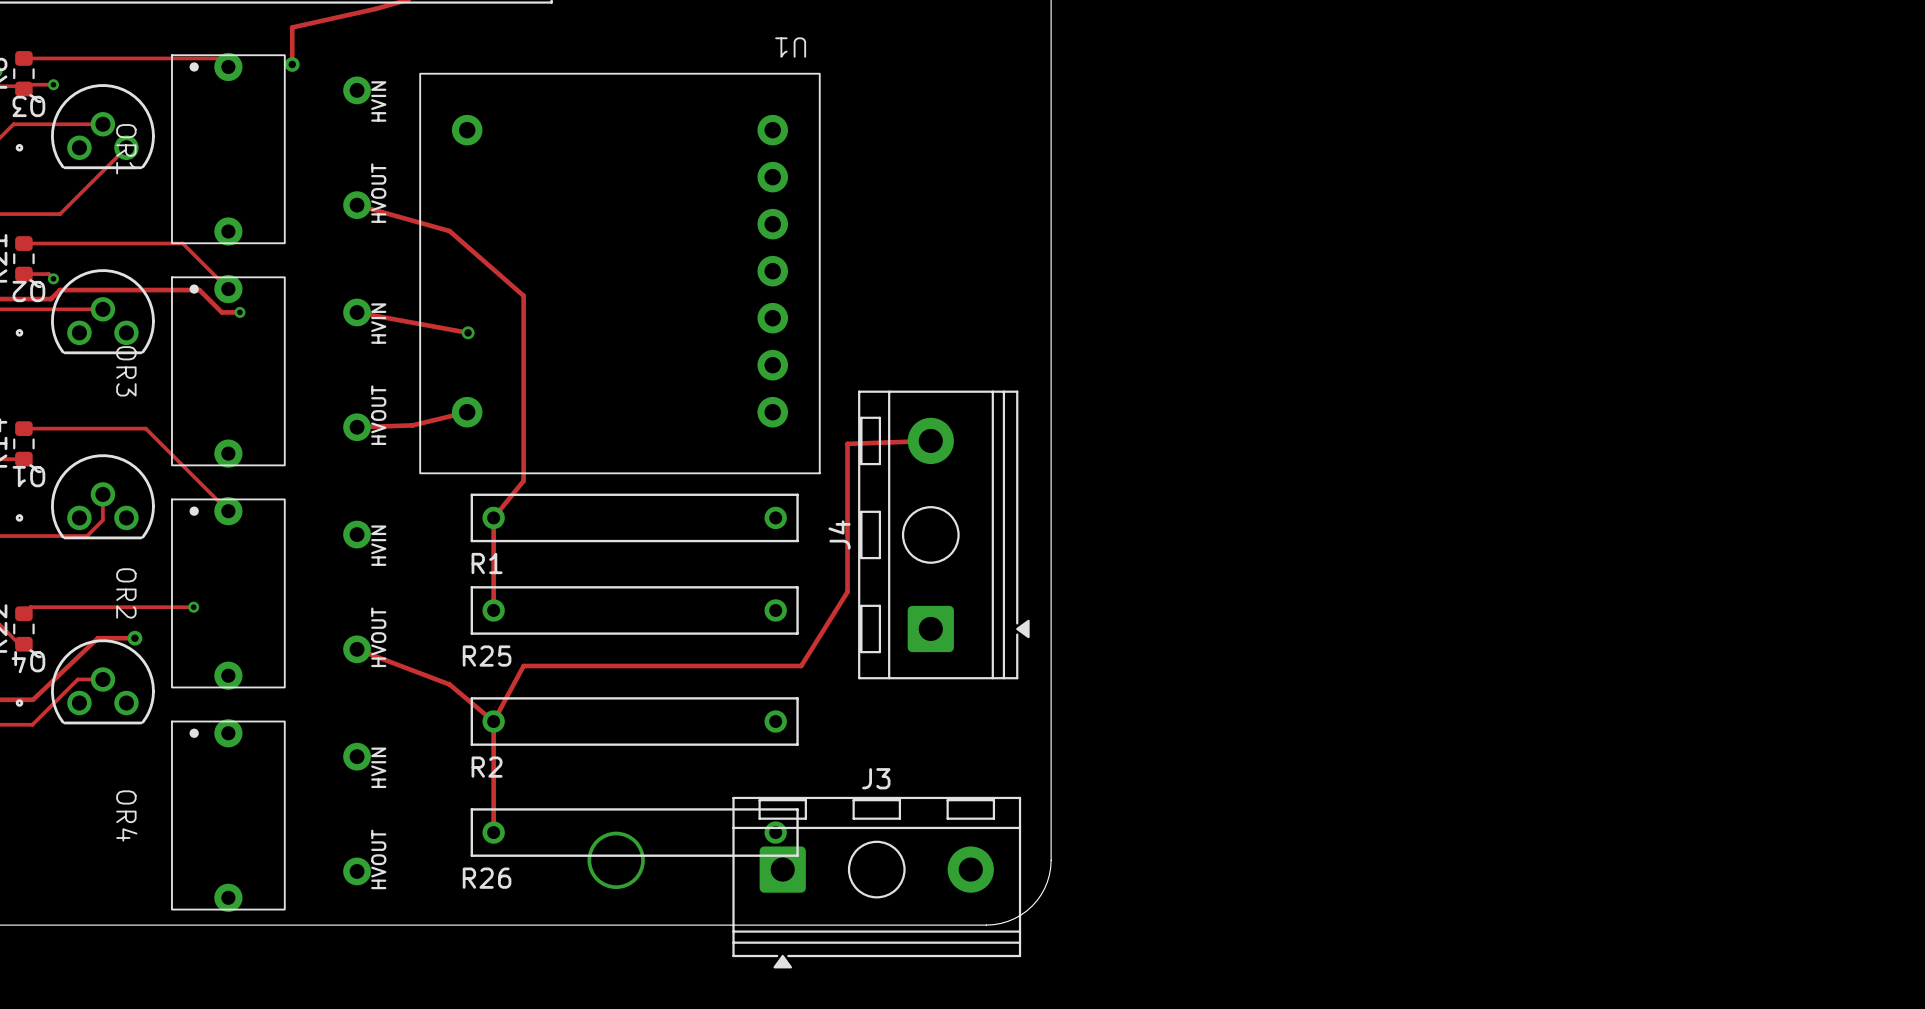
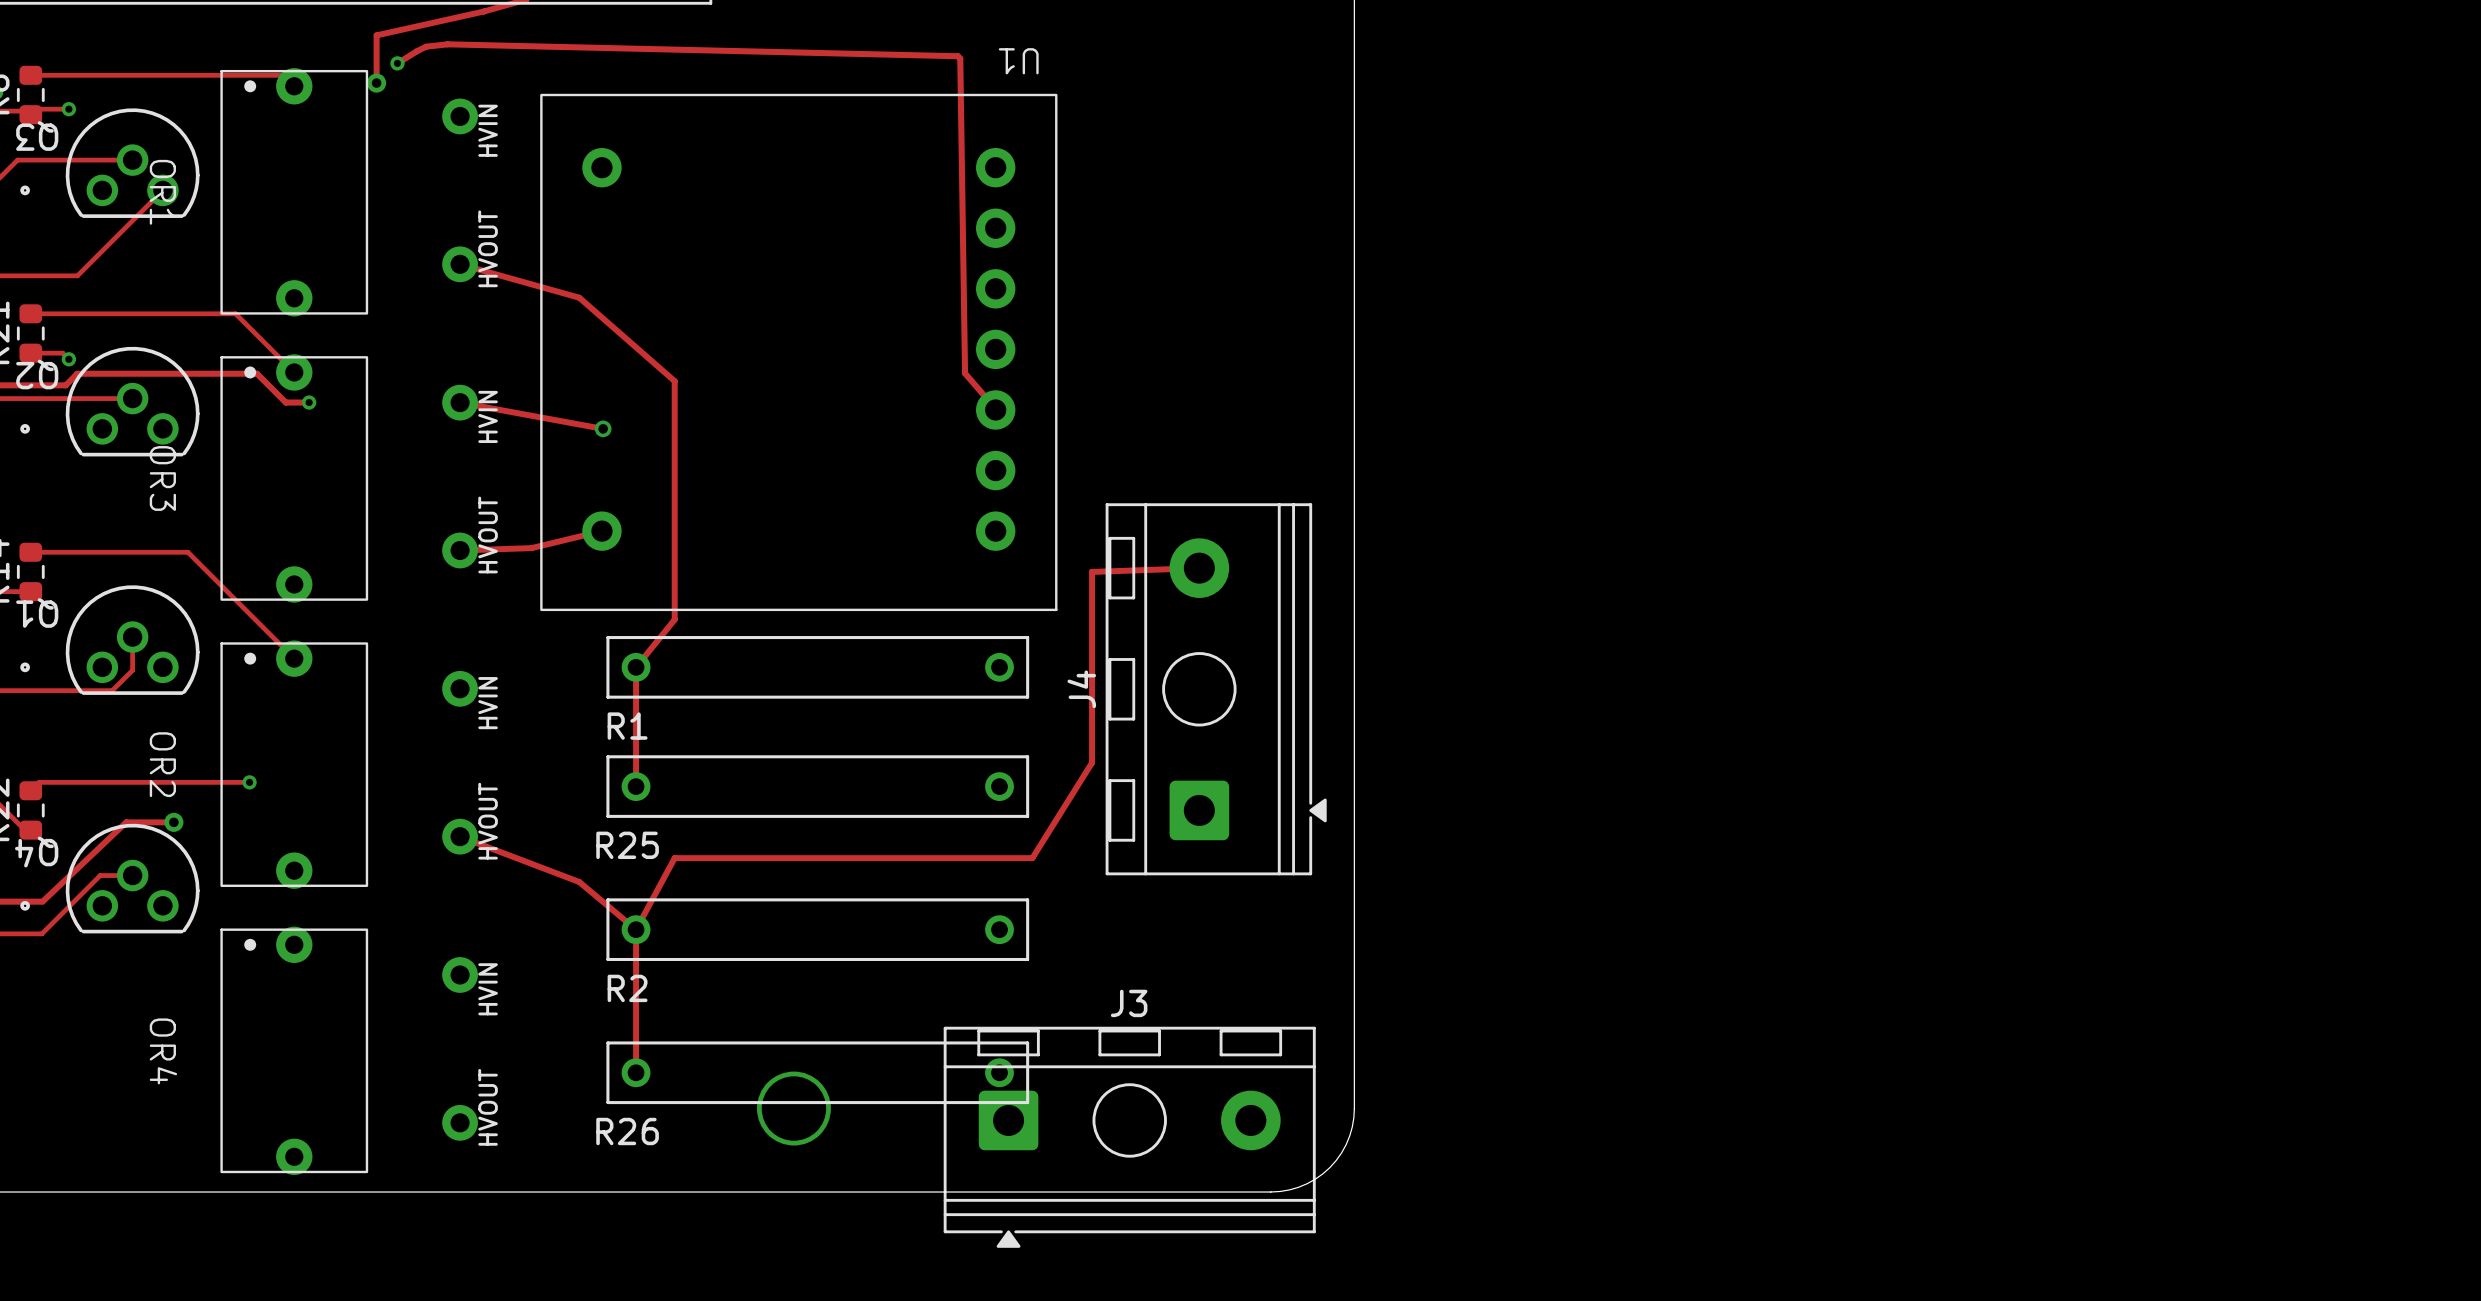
track: none -> (397, 63) (426, 46) (447, 44) (957, 56) (960, 58) (965, 373) (996, 409)
via: none -> (397, 63)

